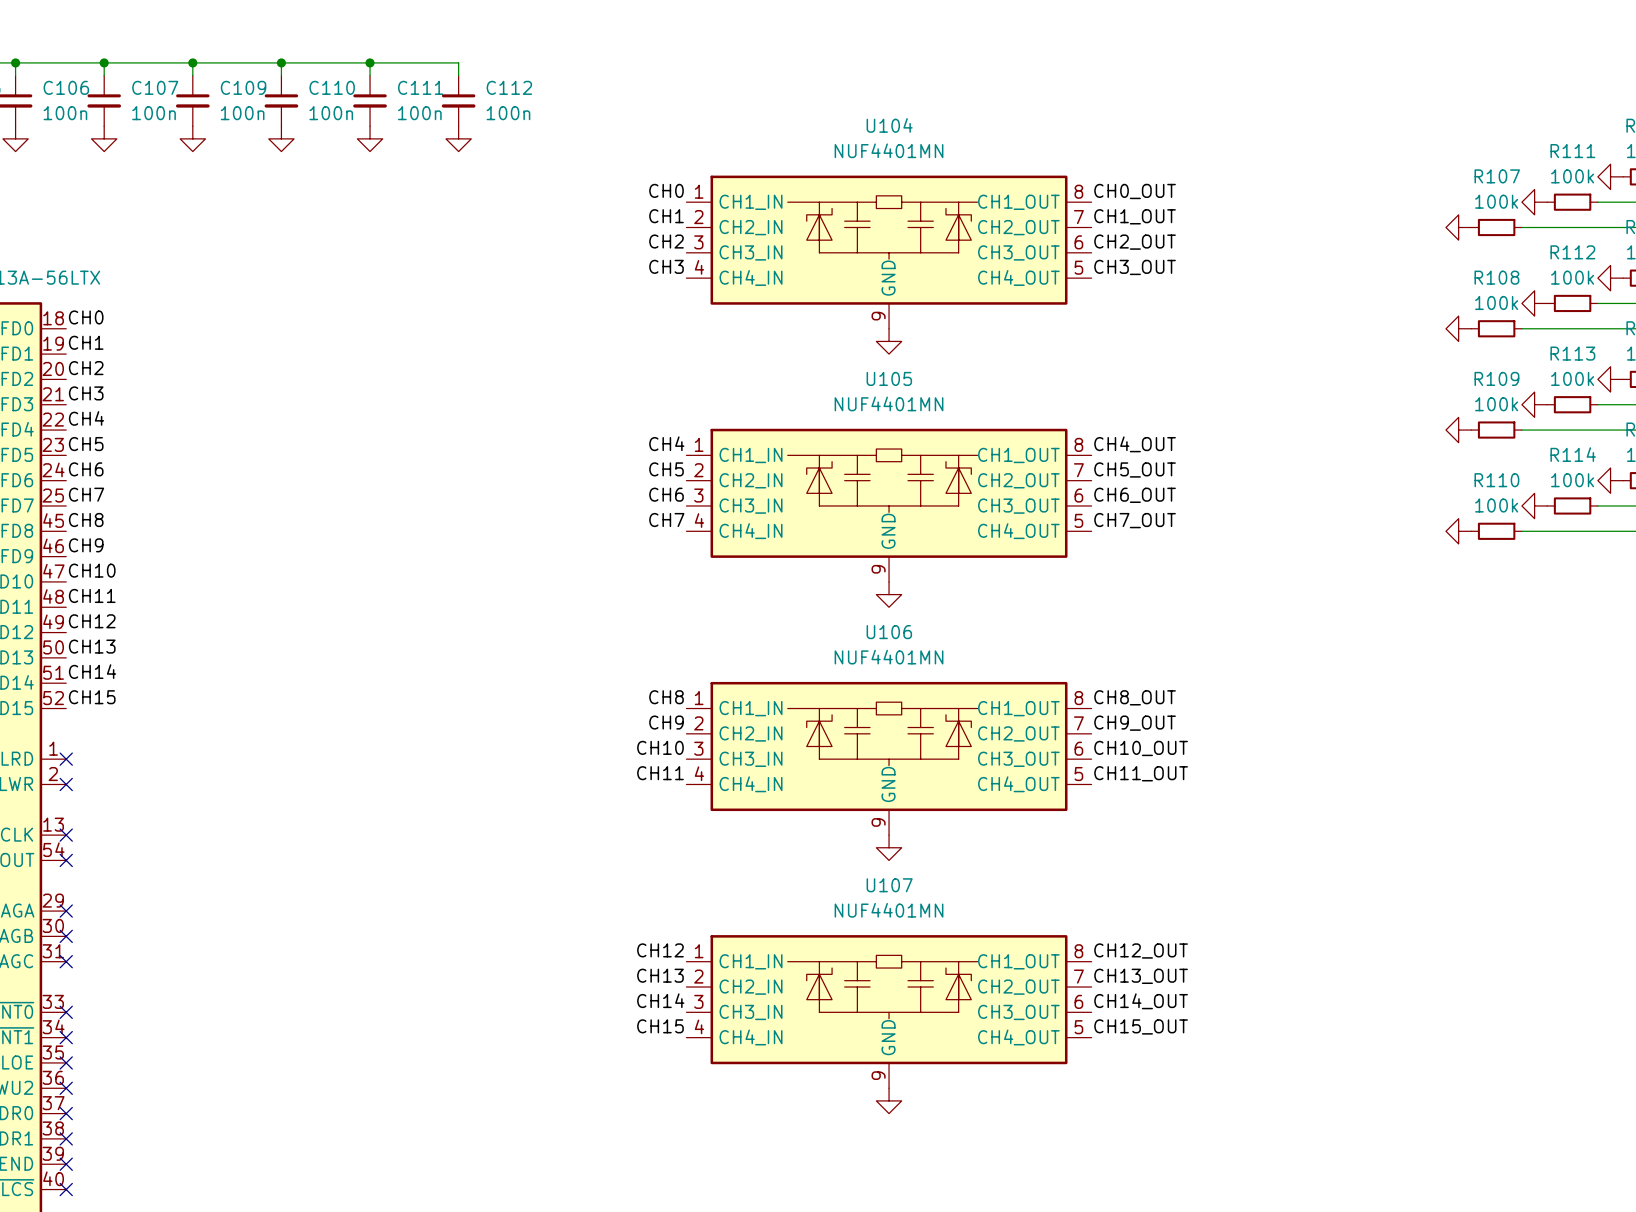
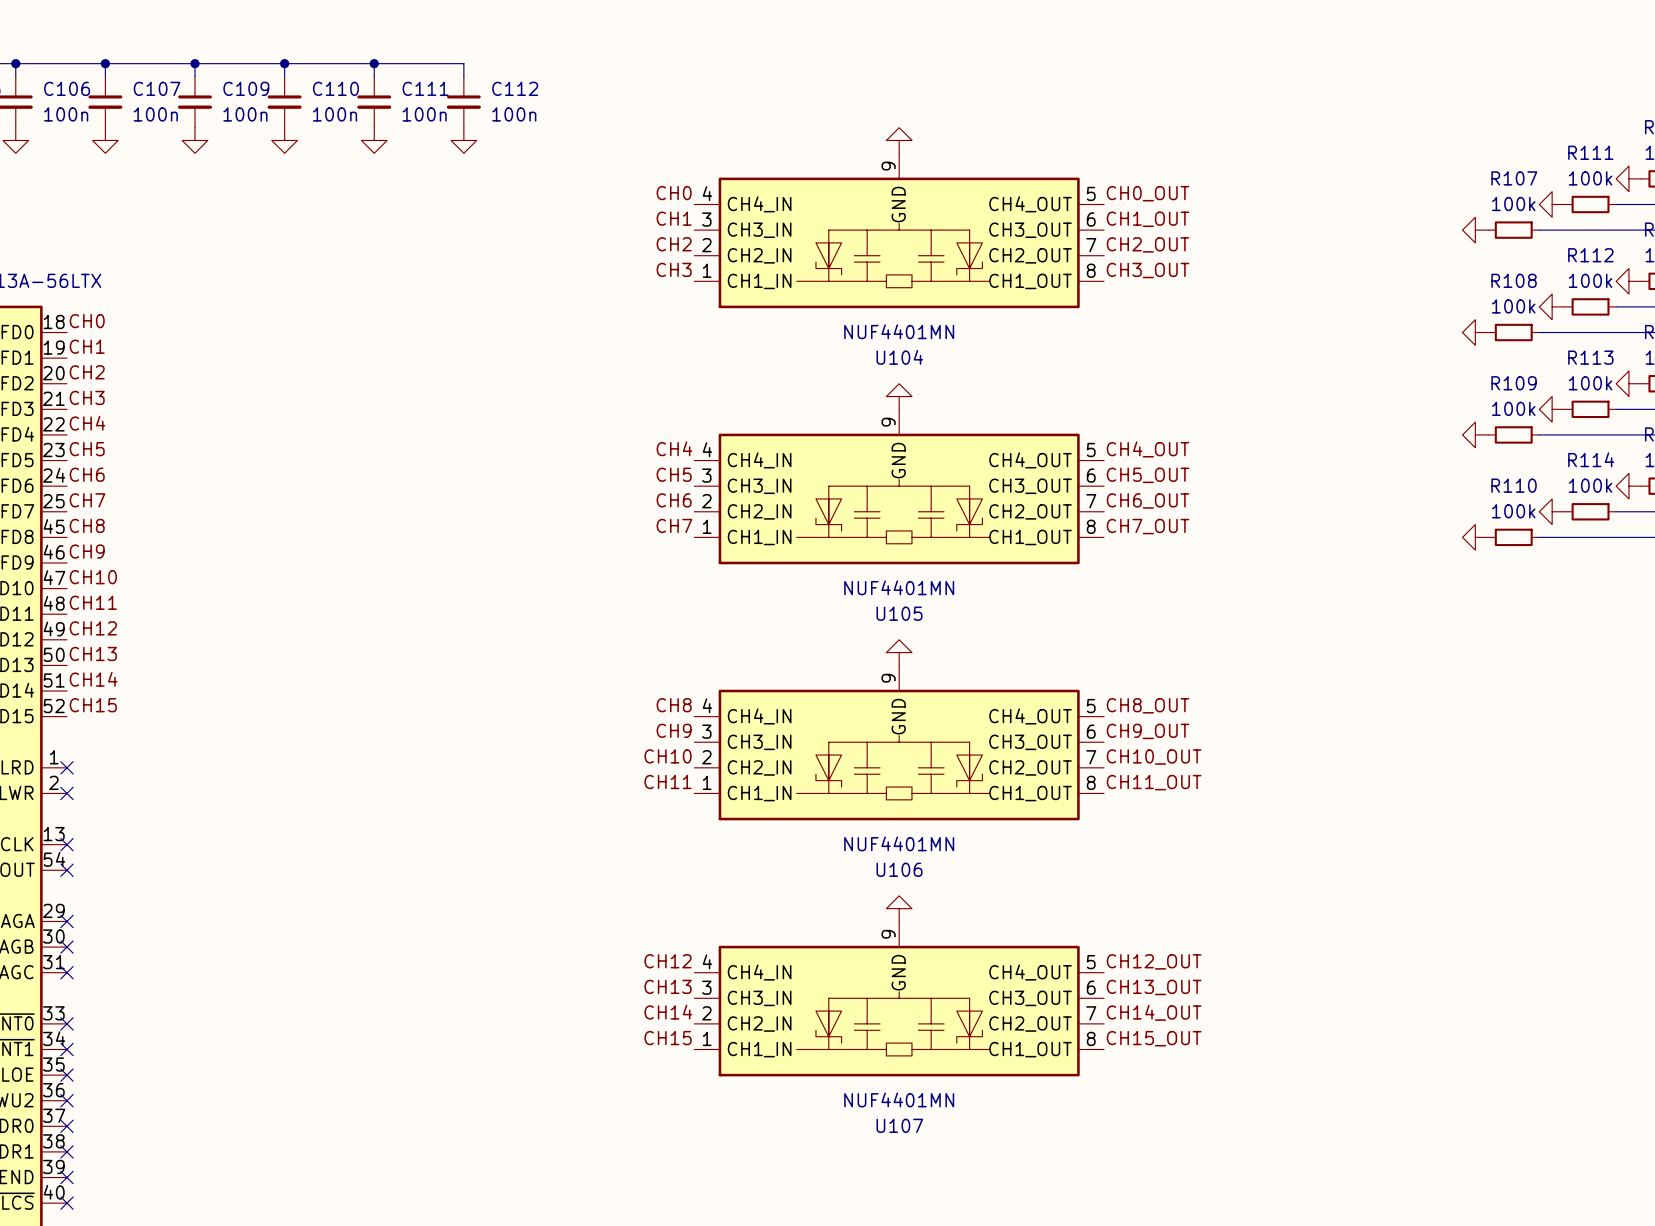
power symbol: none -> (899, 140)
U104 flip: as is (889, 240) -> up-down (899, 242)
power symbol rotation: 0° (889, 341) -> 180° (899, 396)
power symbol position: (889, 341) -> (899, 396)
U105 flip: as is (889, 493) -> up-down (899, 498)
power symbol rotation: 0° (889, 594) -> 180° (899, 652)
power symbol position: (889, 594) -> (899, 652)
U106 flip: as is (889, 746) -> up-down (899, 755)
power symbol rotation: 0° (889, 847) -> 180° (899, 908)
power symbol position: (889, 847) -> (899, 908)
U107 flip: as is (889, 999) -> up-down (899, 1011)
power symbol: (889, 1100) -> none

